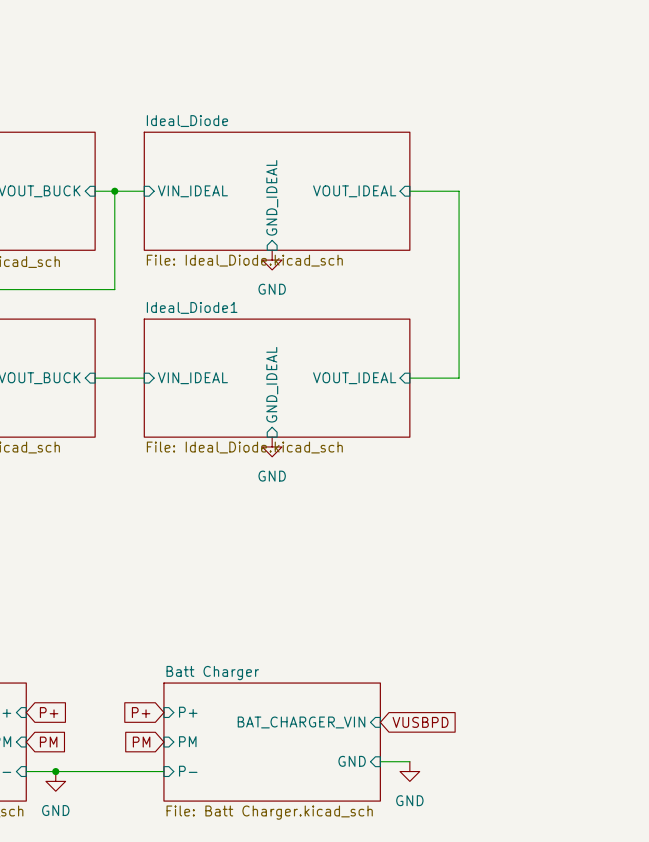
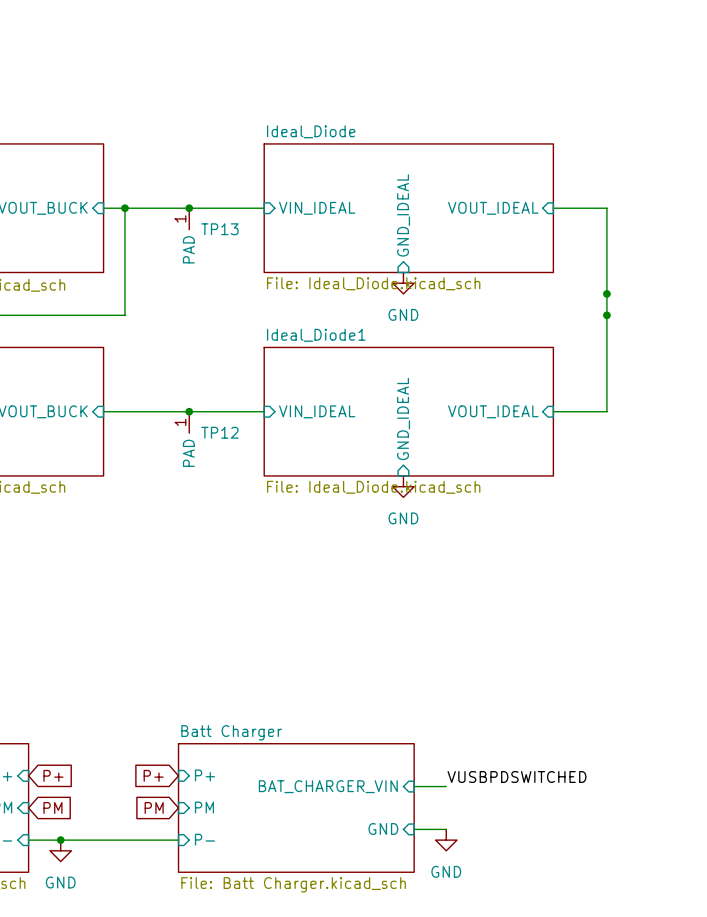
wire: none -> (157, 208) (264, 208)
junction: none -> (189, 208)
sheet pin position: VIN_IDEAL (192, 191) -> VIN_IDEAL (317, 208)
sheet Ideal_Diode position: (277, 191) -> (408, 208)
sheet pin position: VOUT_IDEAL (354, 191) -> VOUT_IDEAL (493, 208)
wire: (409, 191) (459, 191) (459, 378) (409, 378) -> (553, 208) (606, 208) (606, 411) (553, 411)
sheet pin position: GND_IDEAL (272, 197) -> GND_IDEAL (403, 215)
TP13: none -> (189, 218)
power symbol position: GND (272, 260) -> GND (403, 283)
junction: none -> (606, 293)
junction: none -> (606, 315)
wire: none -> (157, 411) (264, 411)
junction: none -> (189, 411)
sheet pin position: VIN_IDEAL (192, 378) -> VIN_IDEAL (317, 411)
sheet Ideal_Diode1 position: (277, 378) -> (408, 411)
sheet pin position: VOUT_IDEAL (354, 378) -> VOUT_IDEAL (493, 411)
sheet pin position: GND_IDEAL (272, 384) -> GND_IDEAL (403, 418)
TP12: none -> (189, 422)
power symbol position: GND (272, 446) -> GND (403, 486)
label: none -> VUSBPDSWITCHED (516, 777)
wire: none -> (414, 786) (446, 786)
global label: VUSBPD (420, 722) -> none

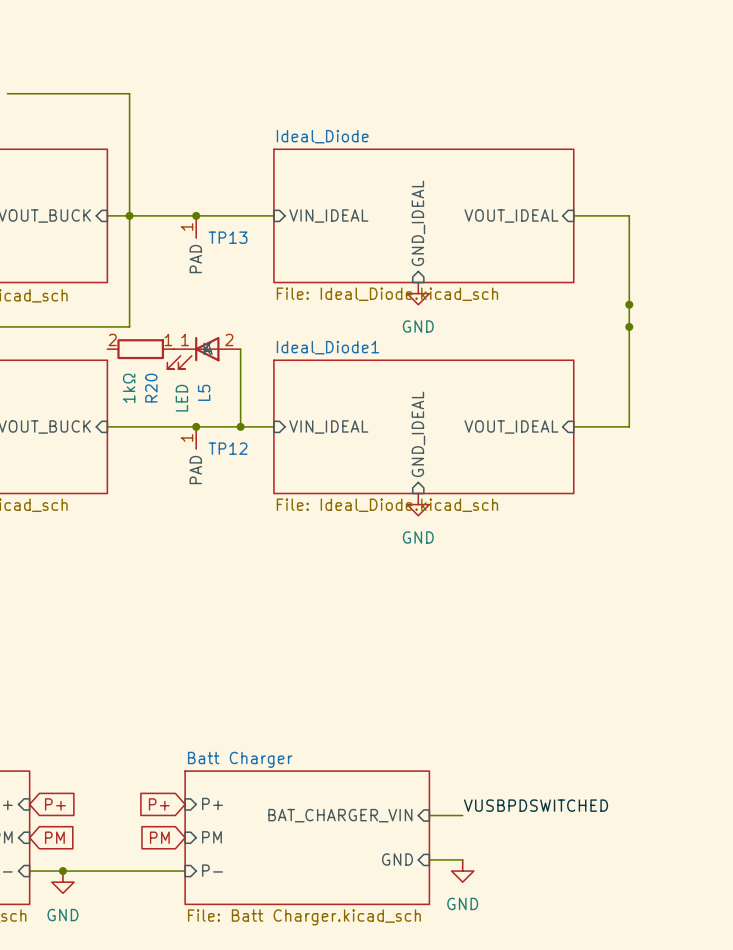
wire: none -> (7, 93) (129, 93) (129, 215)
R20: none -> 1kΩ (140, 349)
wire: none -> (240, 349) (240, 426)
L5: none -> LED (203, 353)
junction: none -> (240, 426)

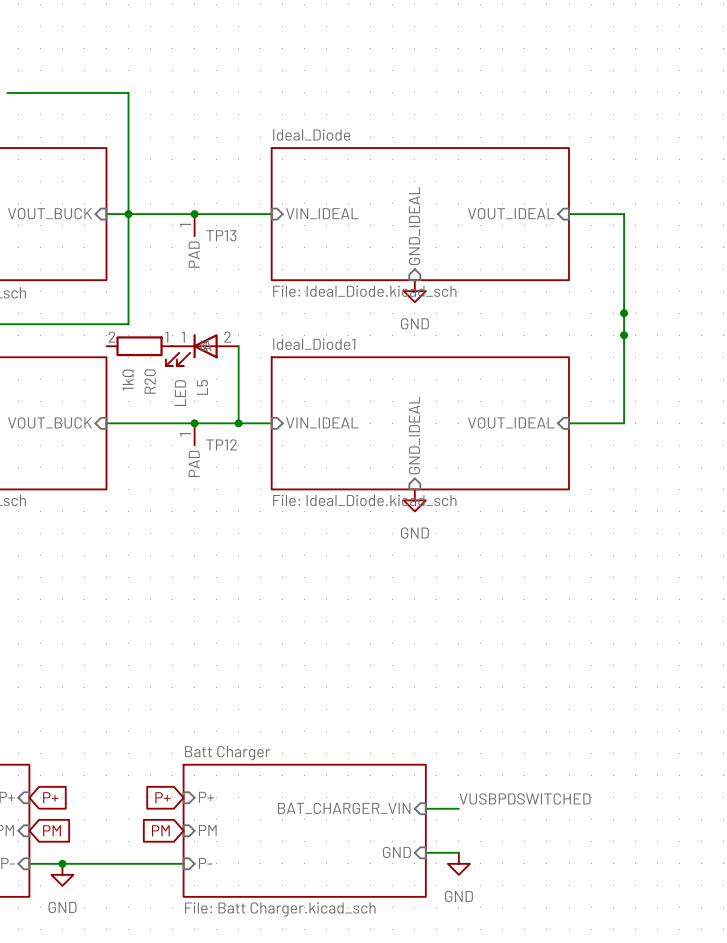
junction: (629, 304) -> none
junction: none -> (624, 313)
junction: (629, 326) -> none
junction: none -> (624, 335)

